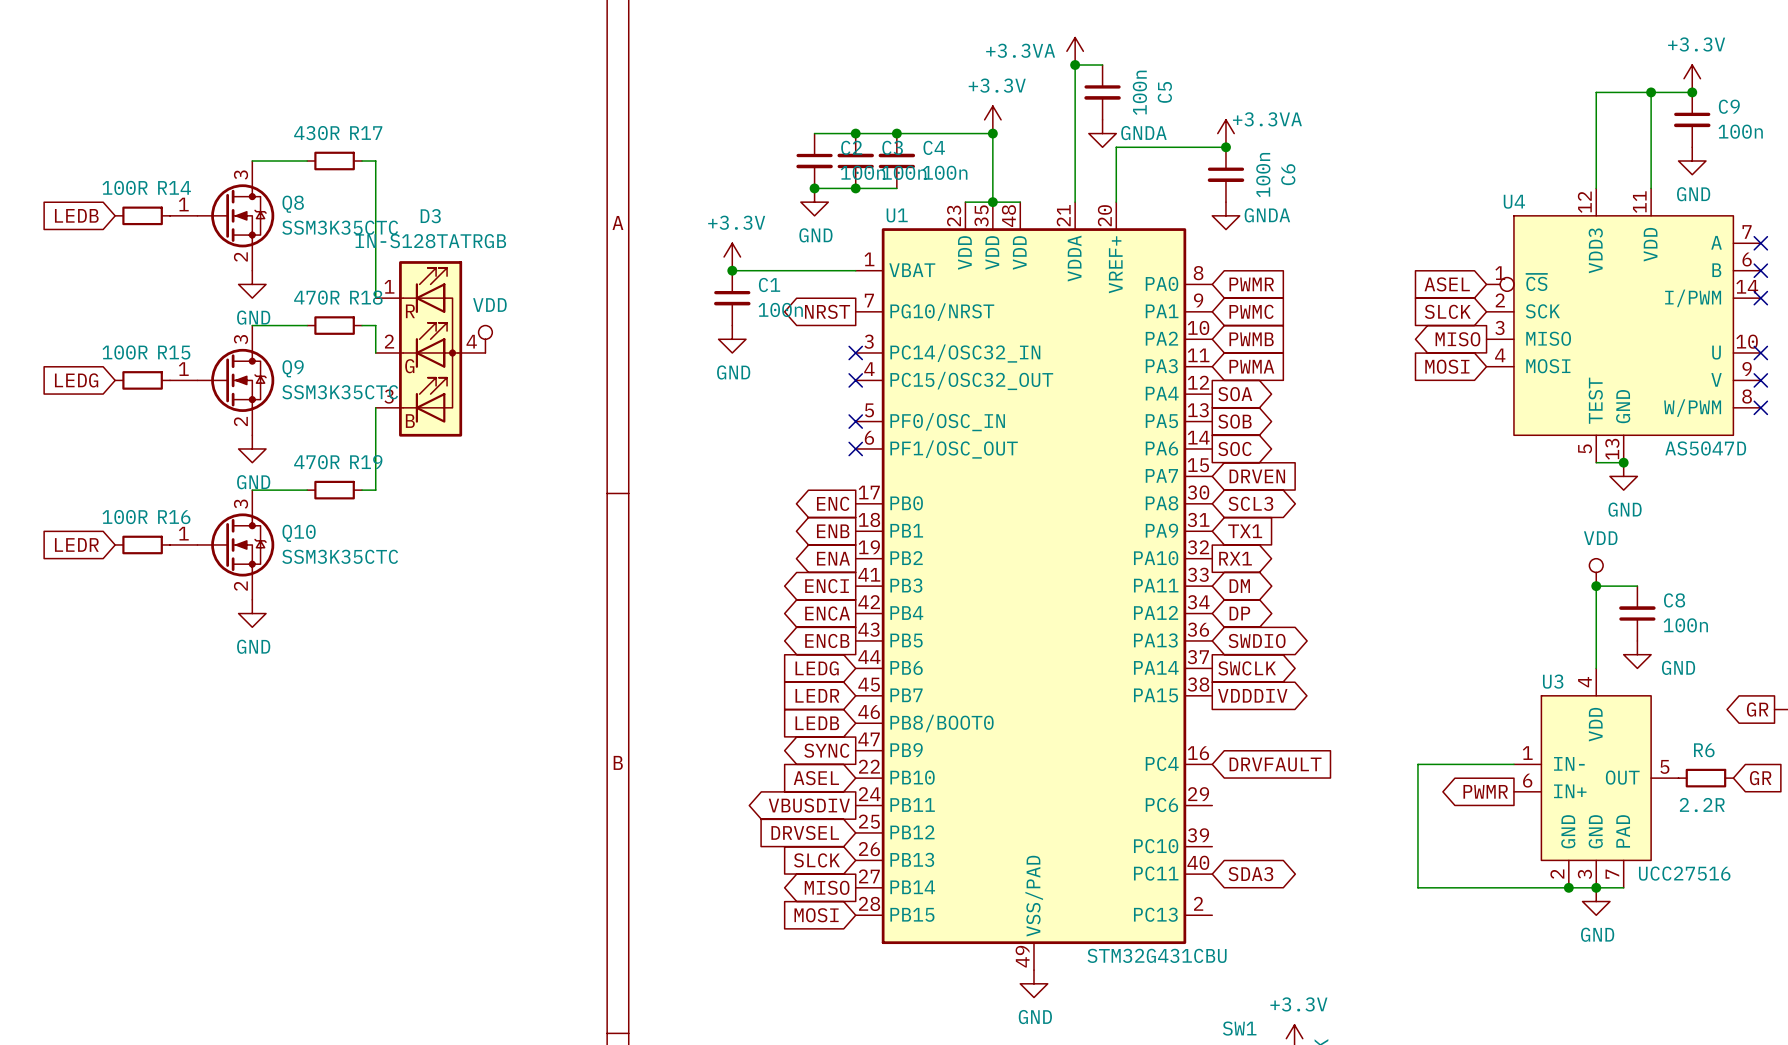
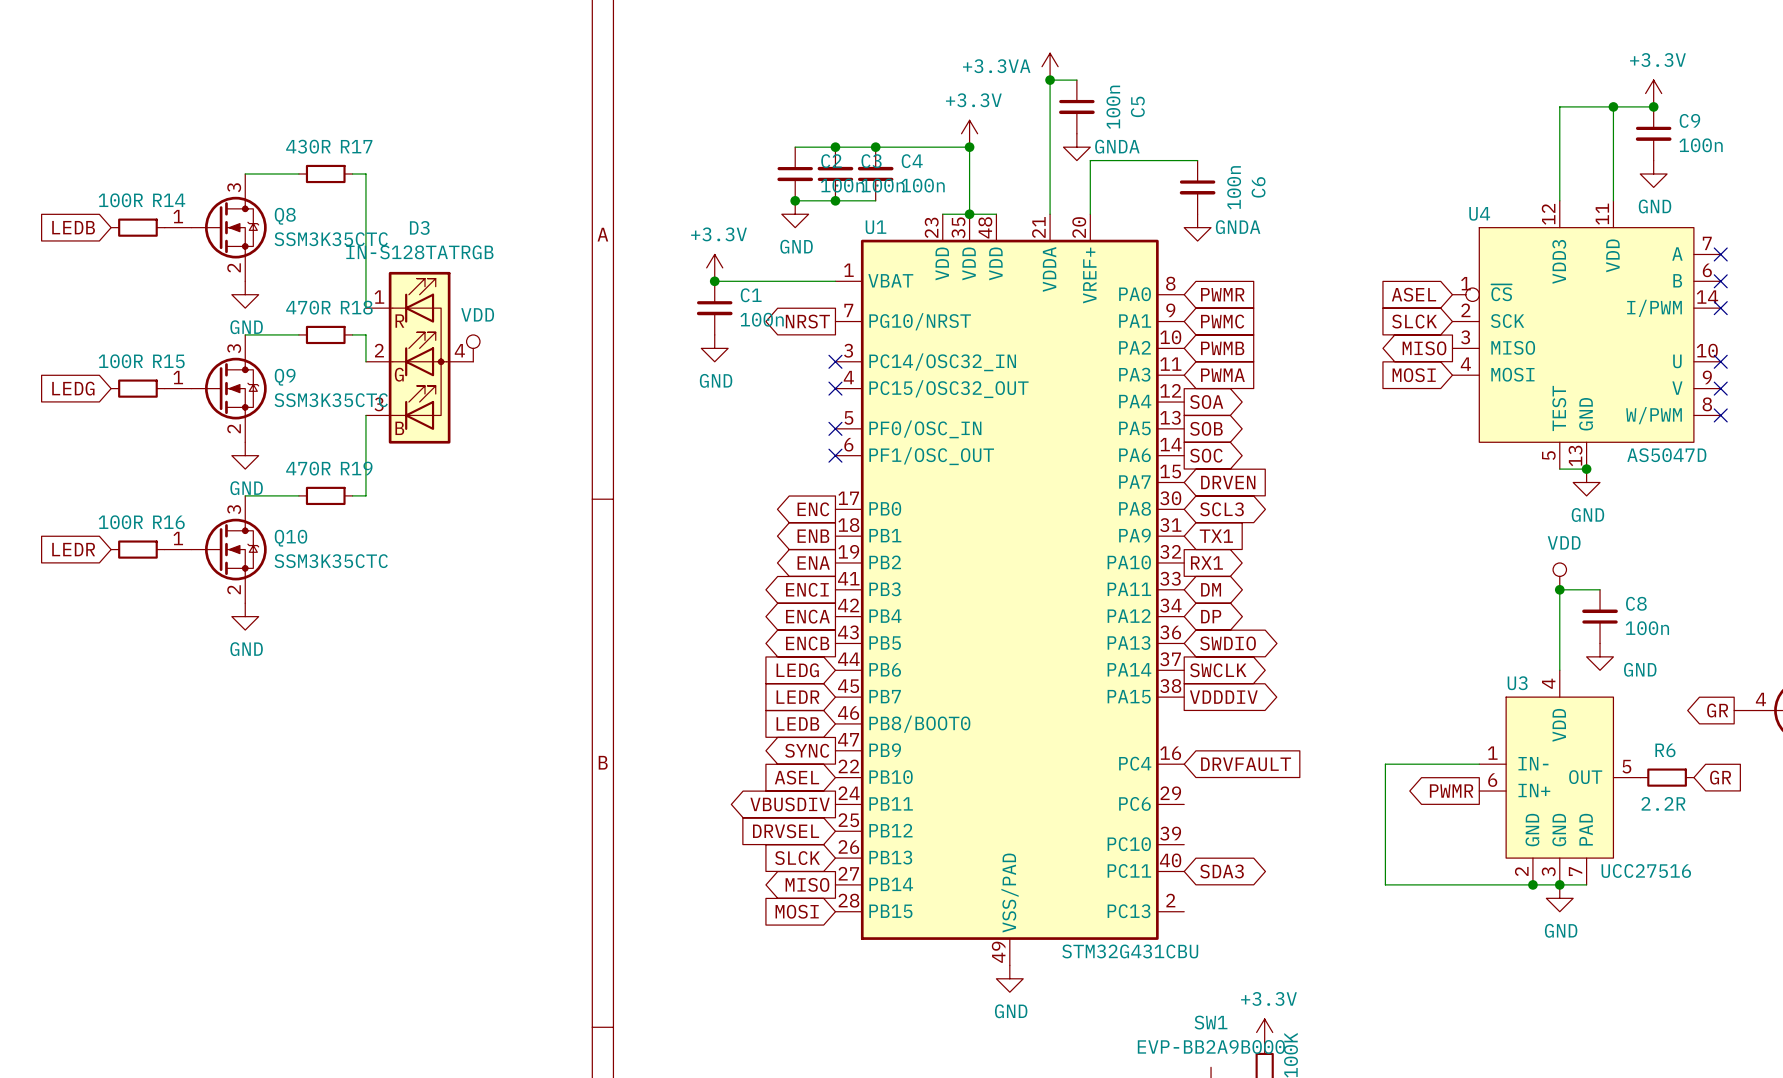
power symbol: +3.3VA (1225, 133) -> none
junction: (1225, 147) -> none

